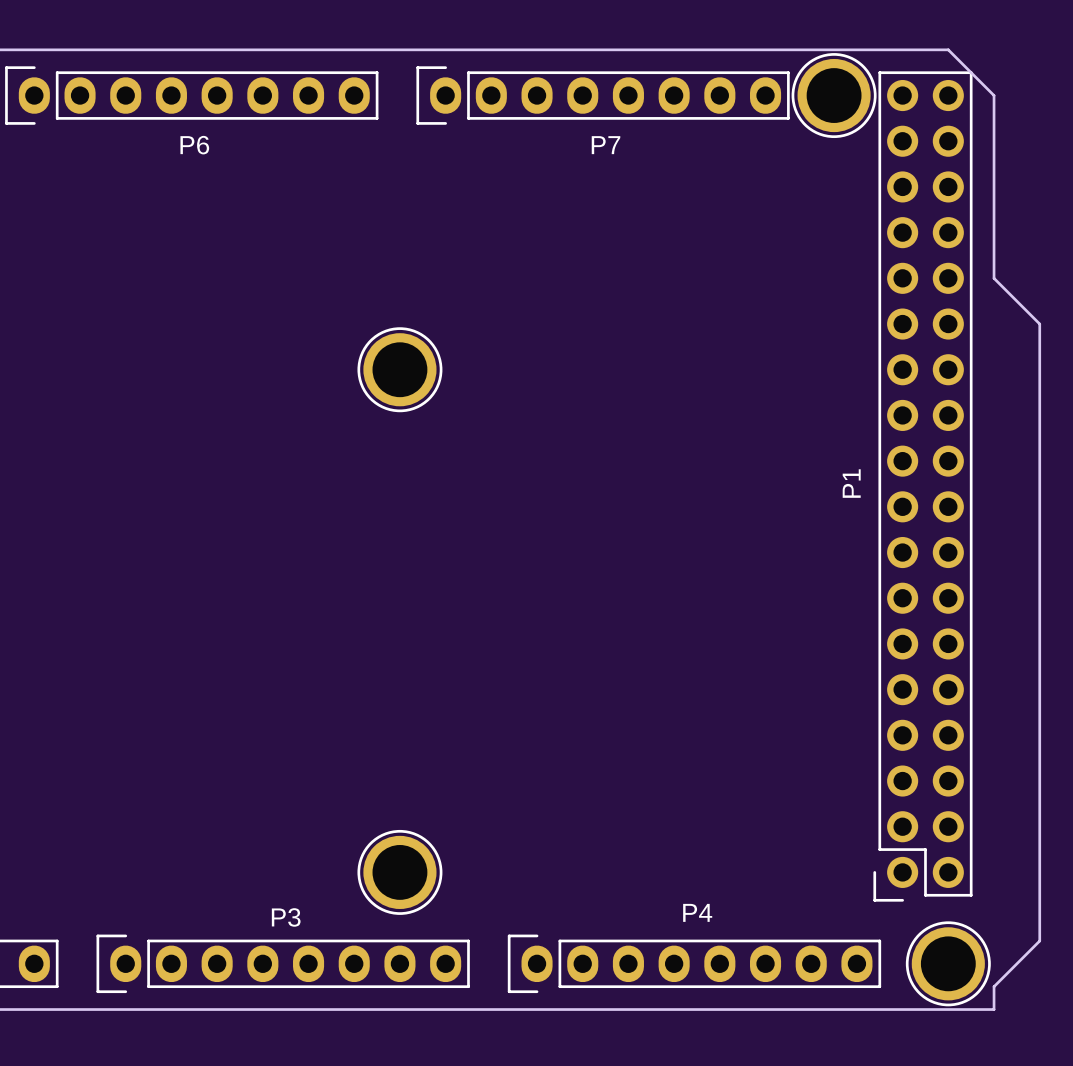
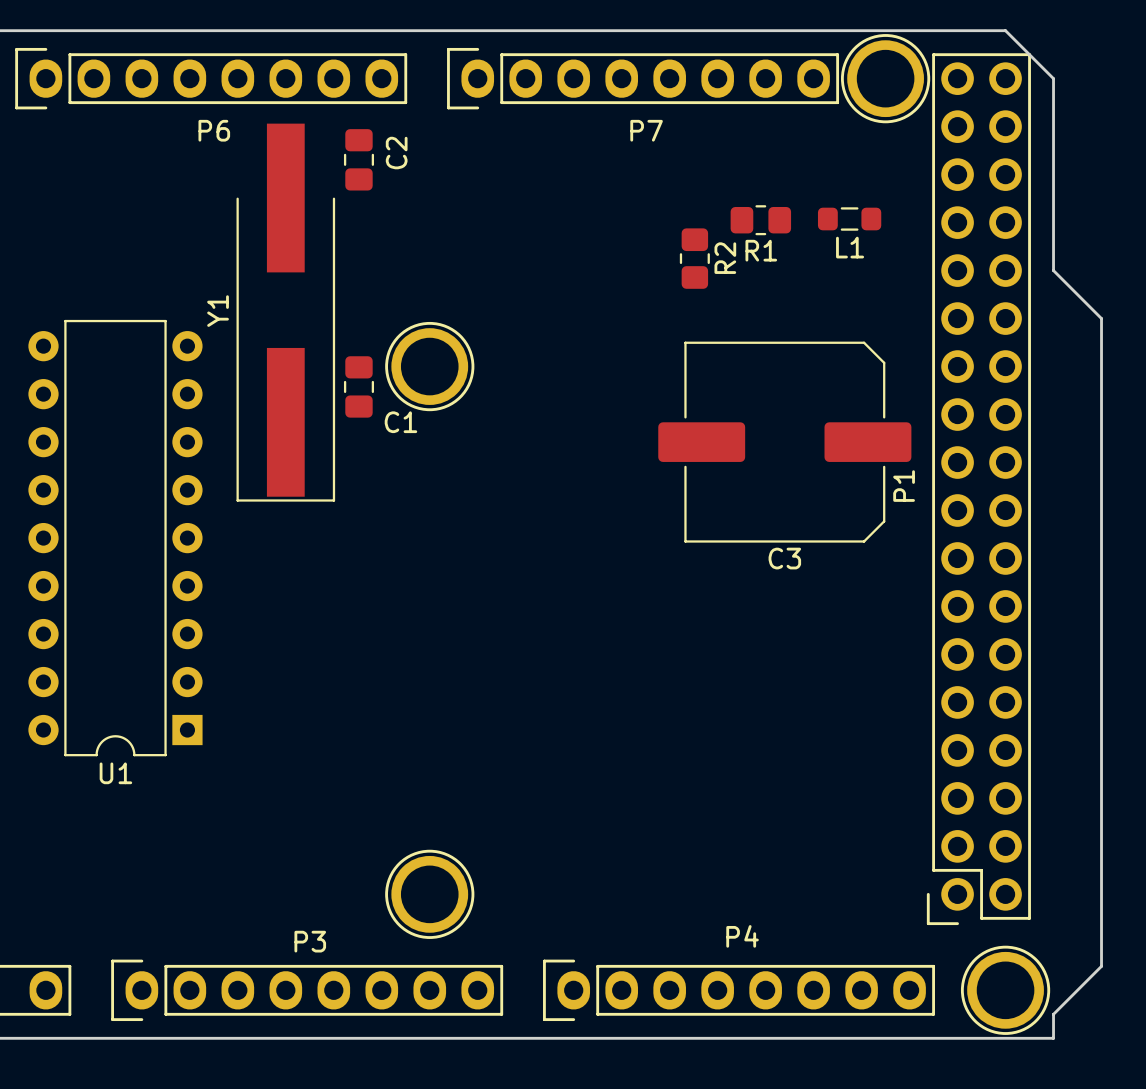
C2: none -> (358, 159)
L1: none -> (849, 219)
R1: none -> (760, 220)
R2: none -> (694, 258)
Y1: none -> (285, 312)
C1: none -> (358, 386)
C3: none -> (784, 442)
U1: none -> (115, 538)

